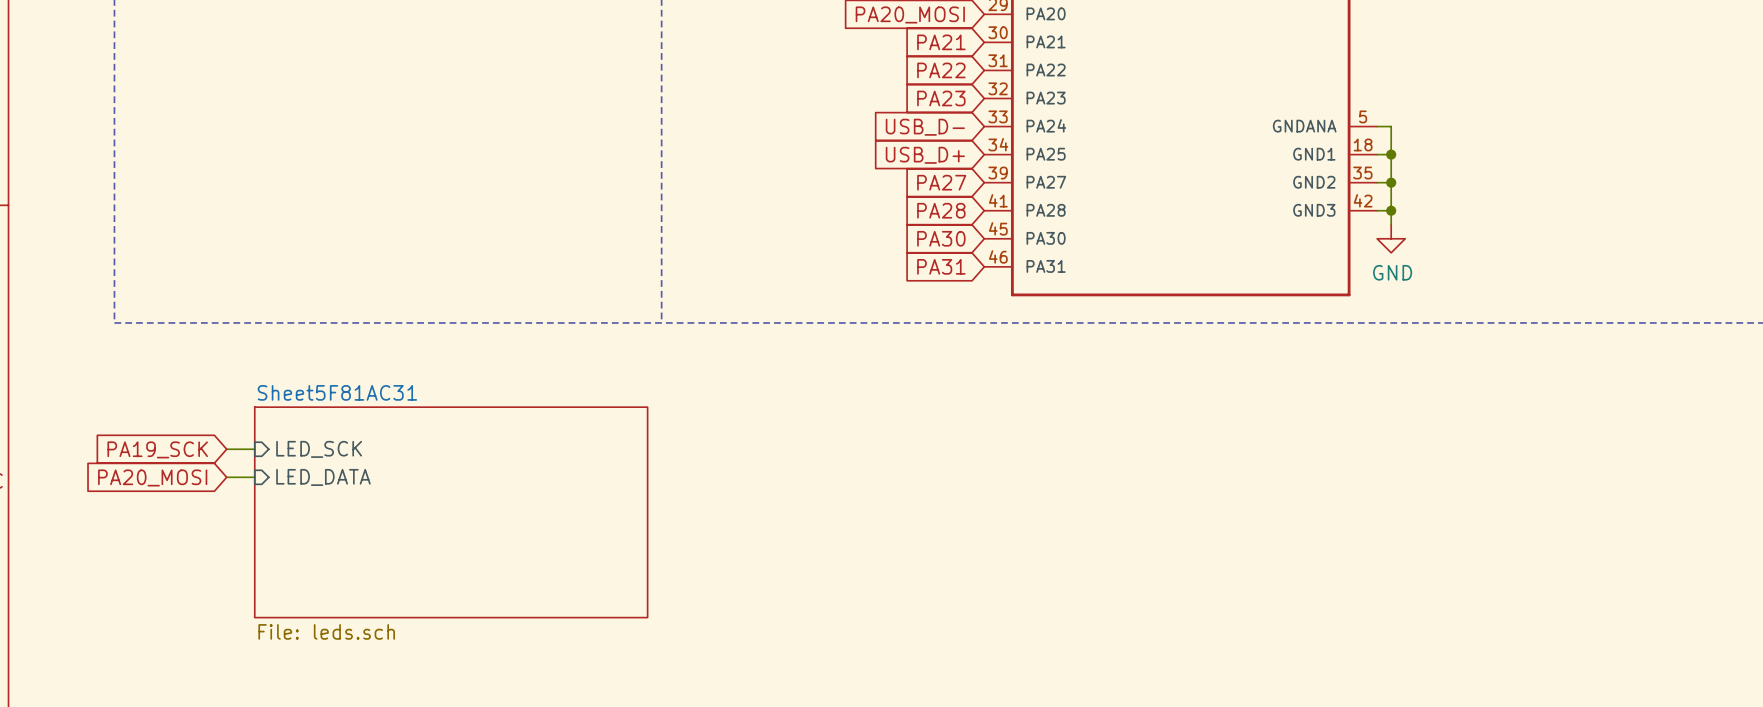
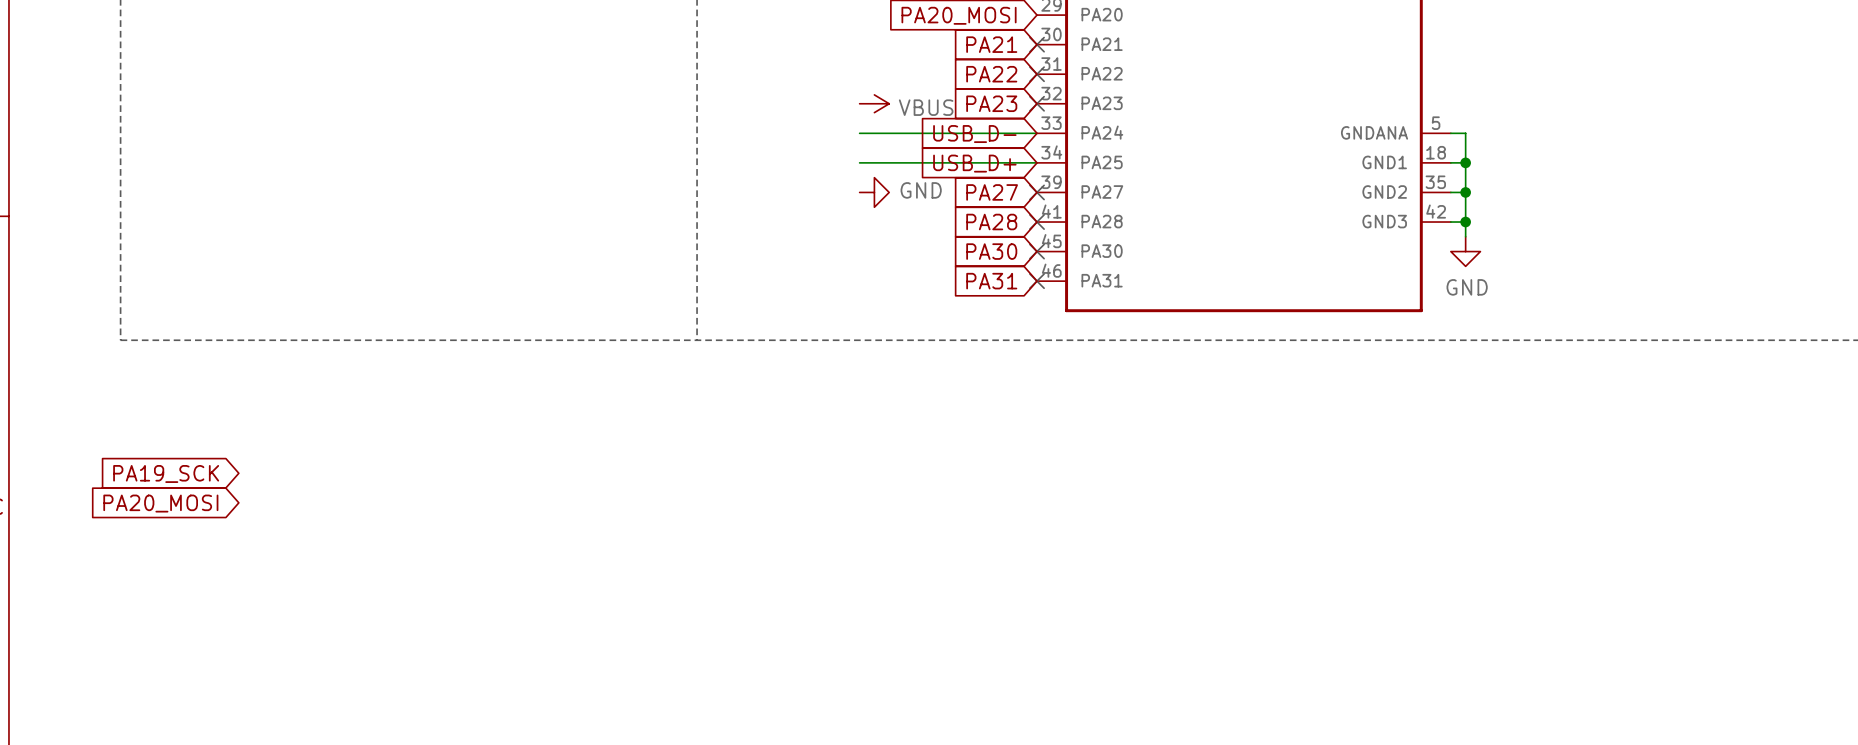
no-connect mark: none -> (1037, 44)
no-connect mark: none -> (1037, 74)
power symbol: none -> VBUS (874, 103)
no-connect mark: none -> (1037, 103)
wire: none -> (859, 133) (1037, 133)
wire: none -> (859, 162) (1037, 162)
power symbol: none -> GND (874, 192)
no-connect mark: none -> (1037, 192)
no-connect mark: none -> (1037, 222)
no-connect mark: none -> (1037, 251)
no-connect mark: none -> (1037, 281)
wire: (226, 449) (254, 449) -> none
sheet pin: LED_SCK (319, 449) -> none
wire: (226, 477) (254, 477) -> none
sheet pin: LED_DATA (323, 477) -> none
sheet Sheet5F81AC31: File: leds.sch (451, 512) -> none

